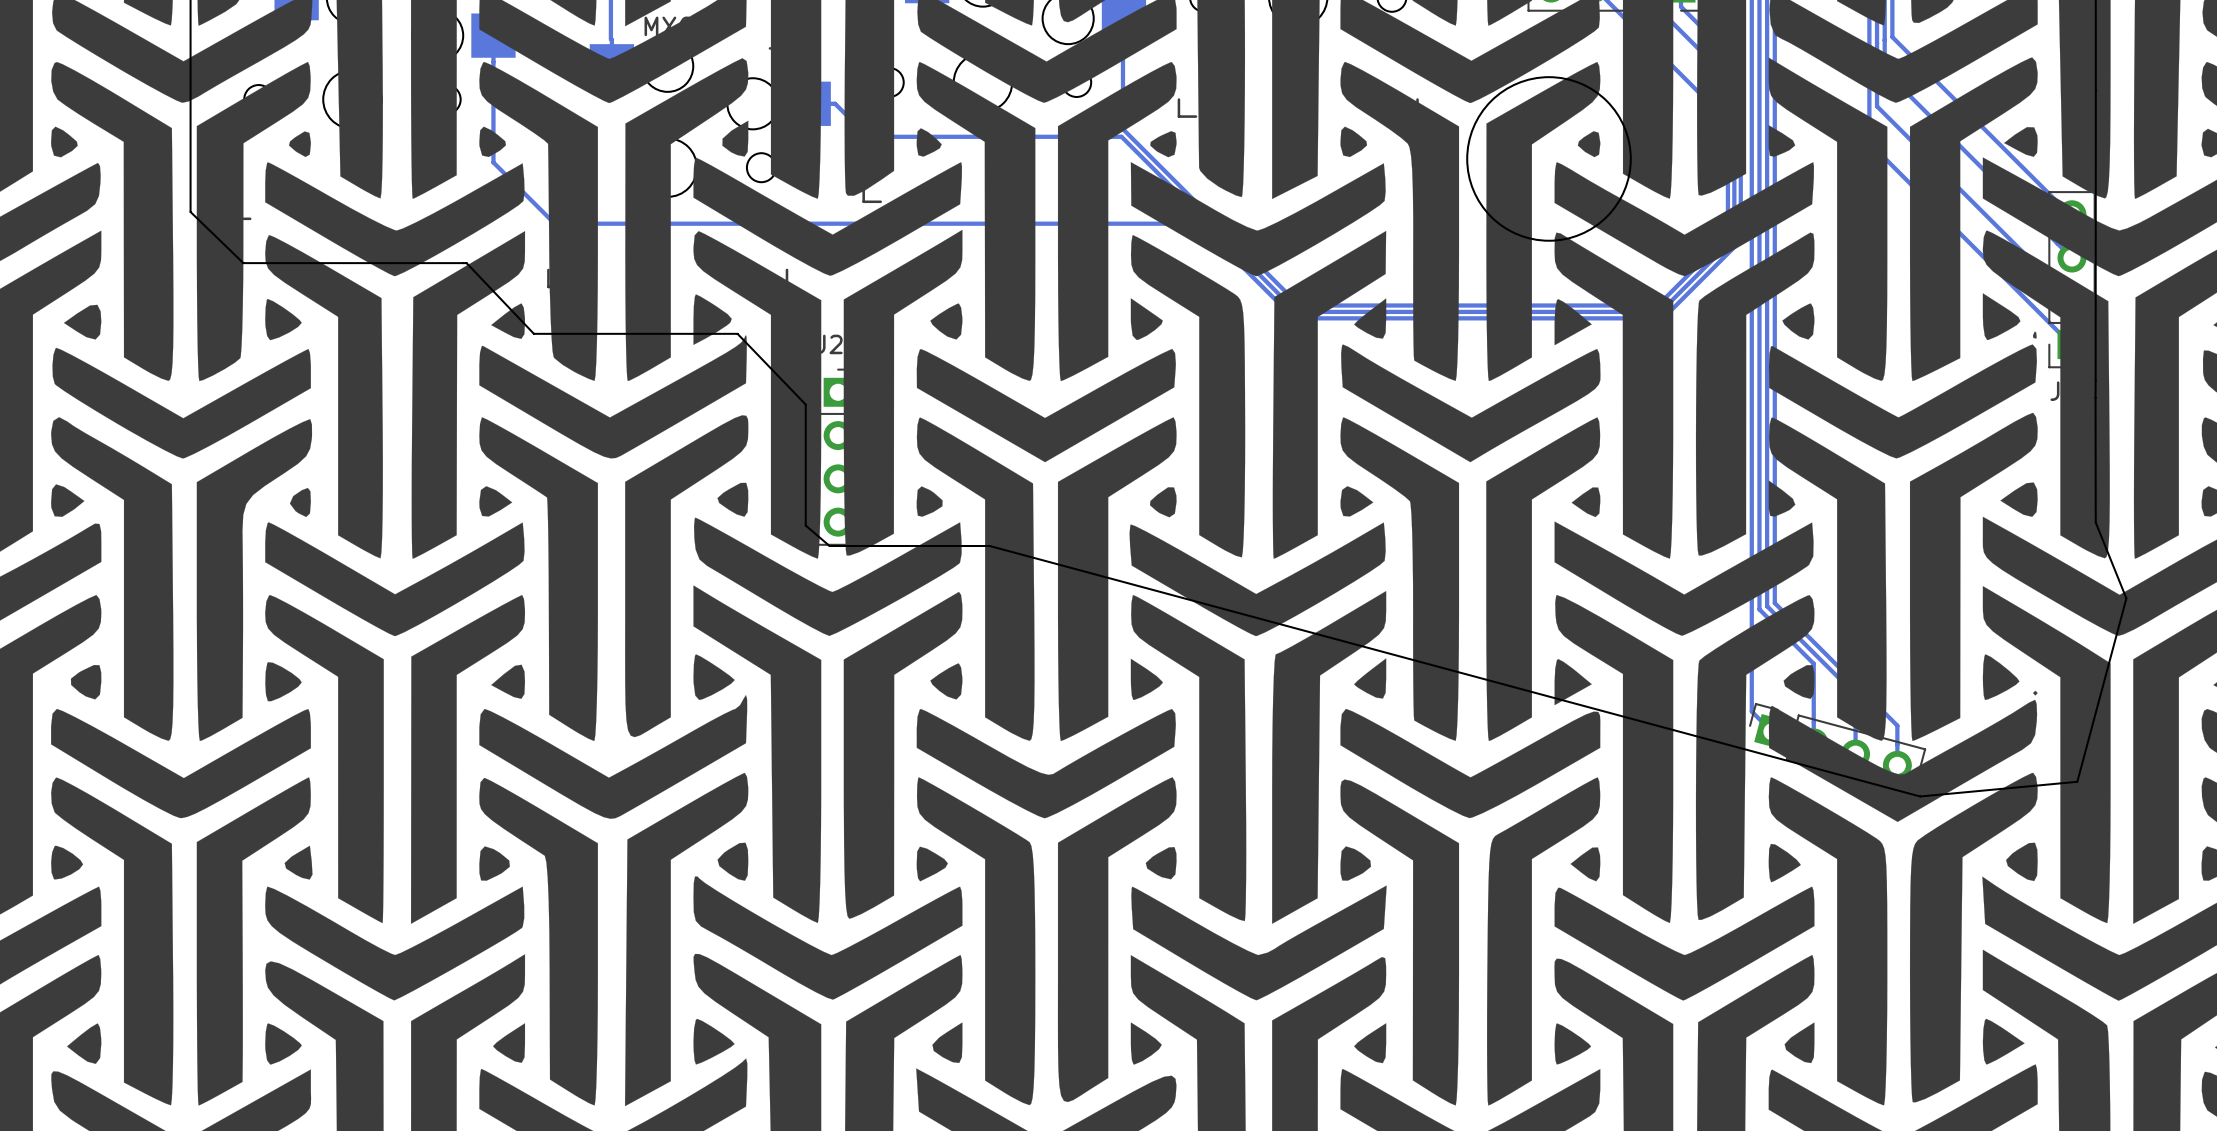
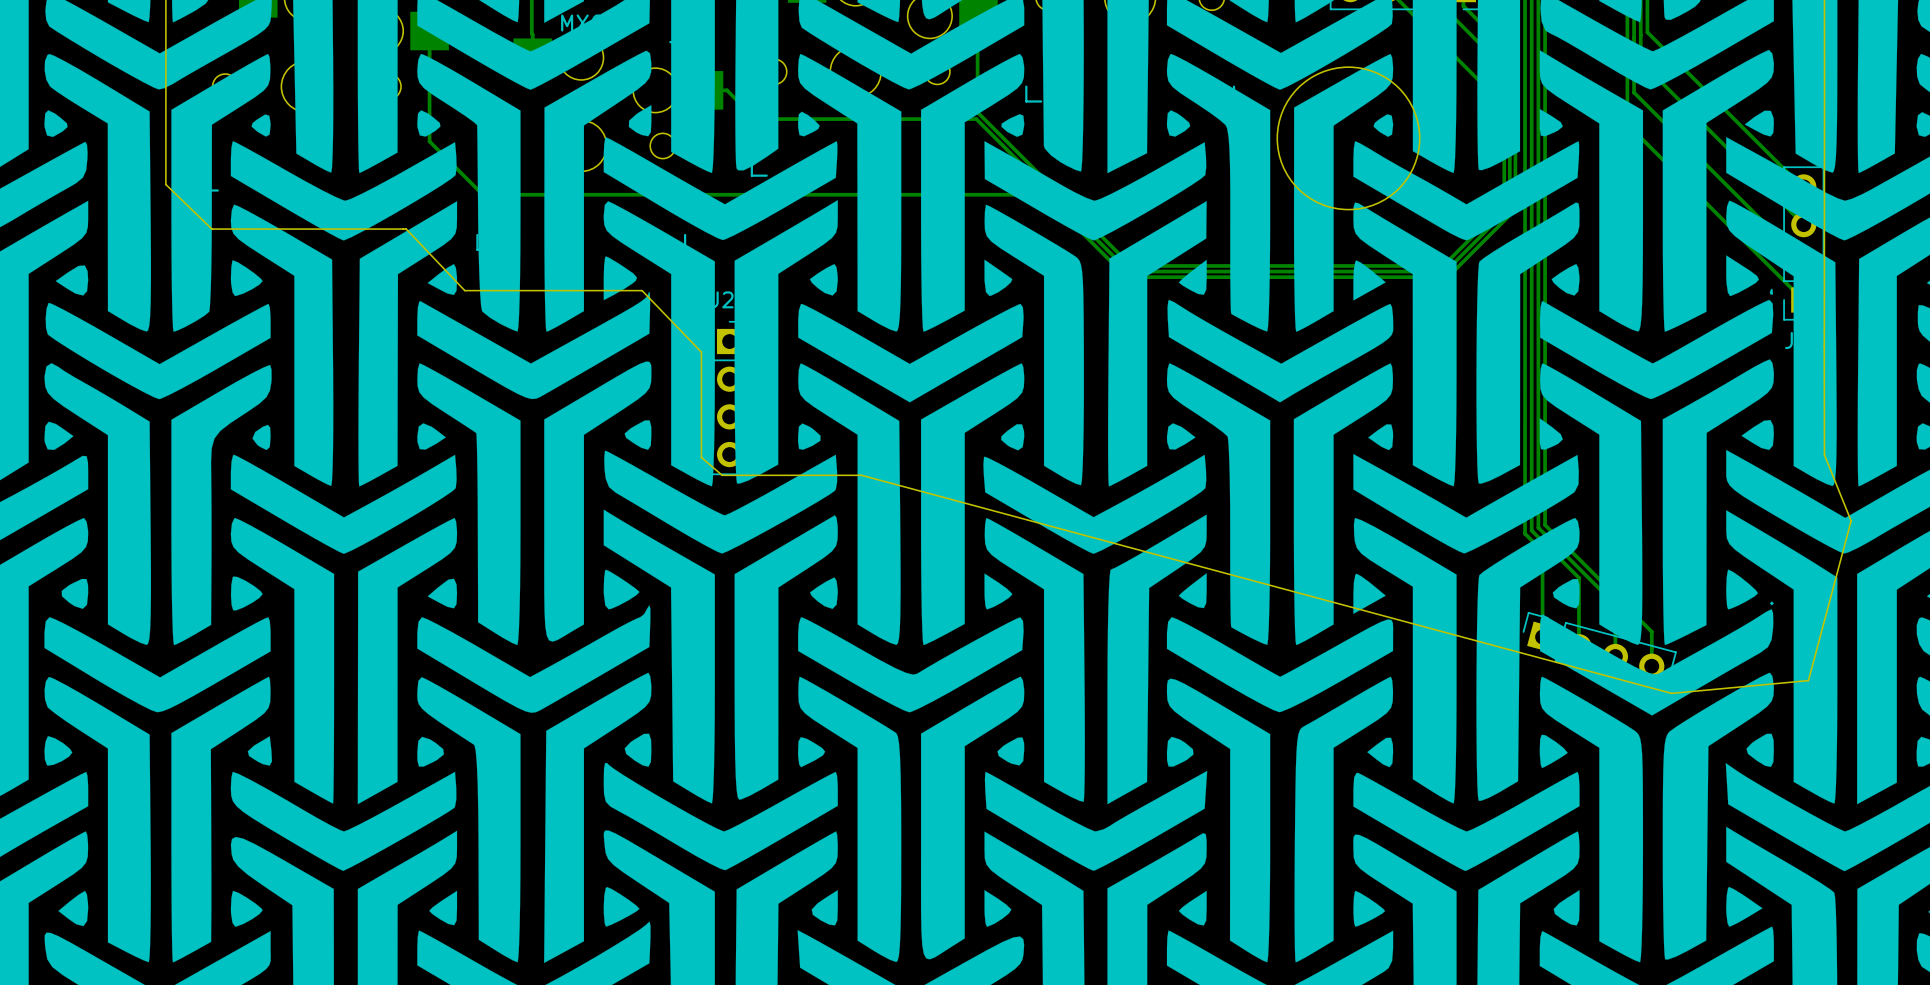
bottom track: (1751, 613) (1751, 711) (1771, 731) -> (1525, 533) (1542, 551) (1542, 637)

